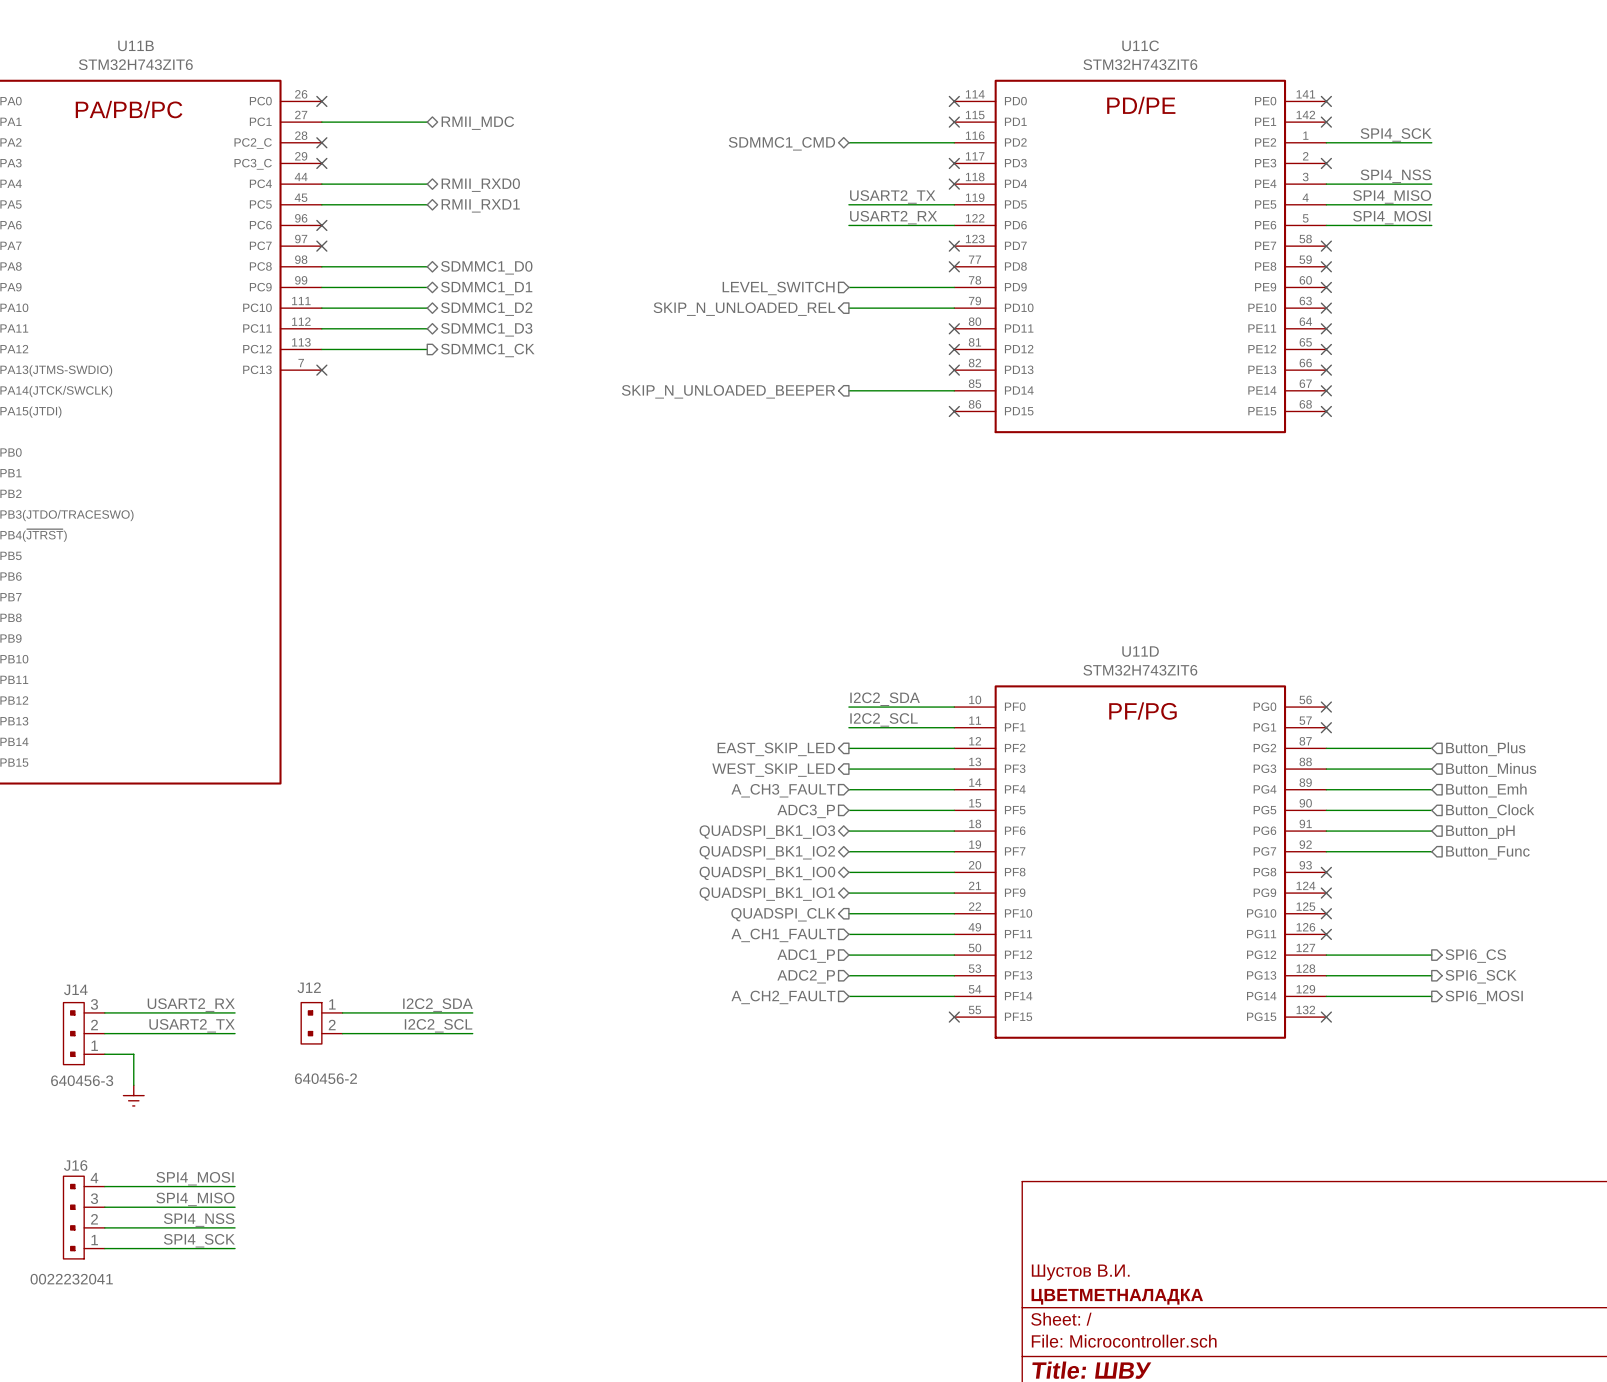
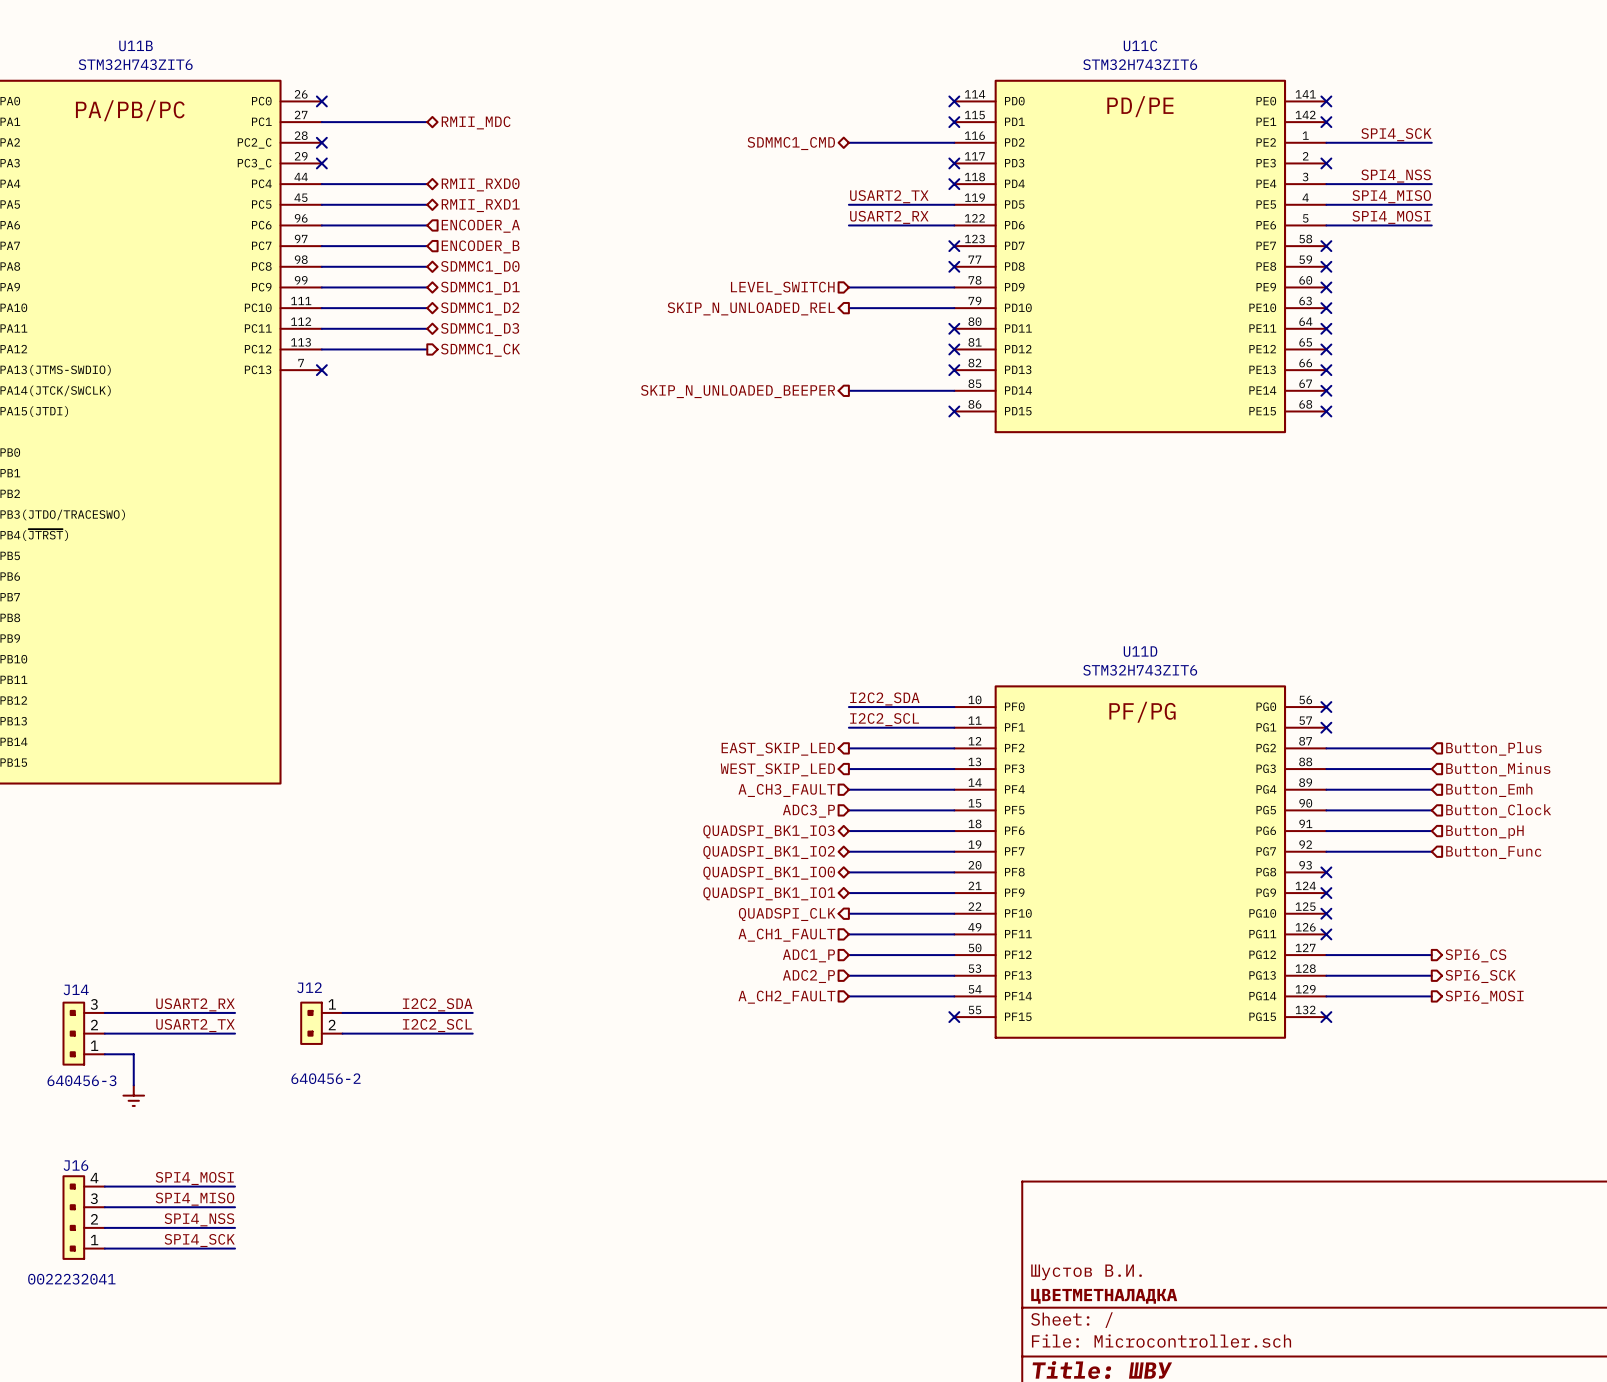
wire: none -> (321, 225) (427, 225)
no-connect mark: (321, 225) -> none
hierarchical label: none -> ENCODER_A (480, 226)
wire: none -> (321, 246) (427, 246)
no-connect mark: (321, 246) -> none
hierarchical label: none -> ENCODER_B (480, 246)

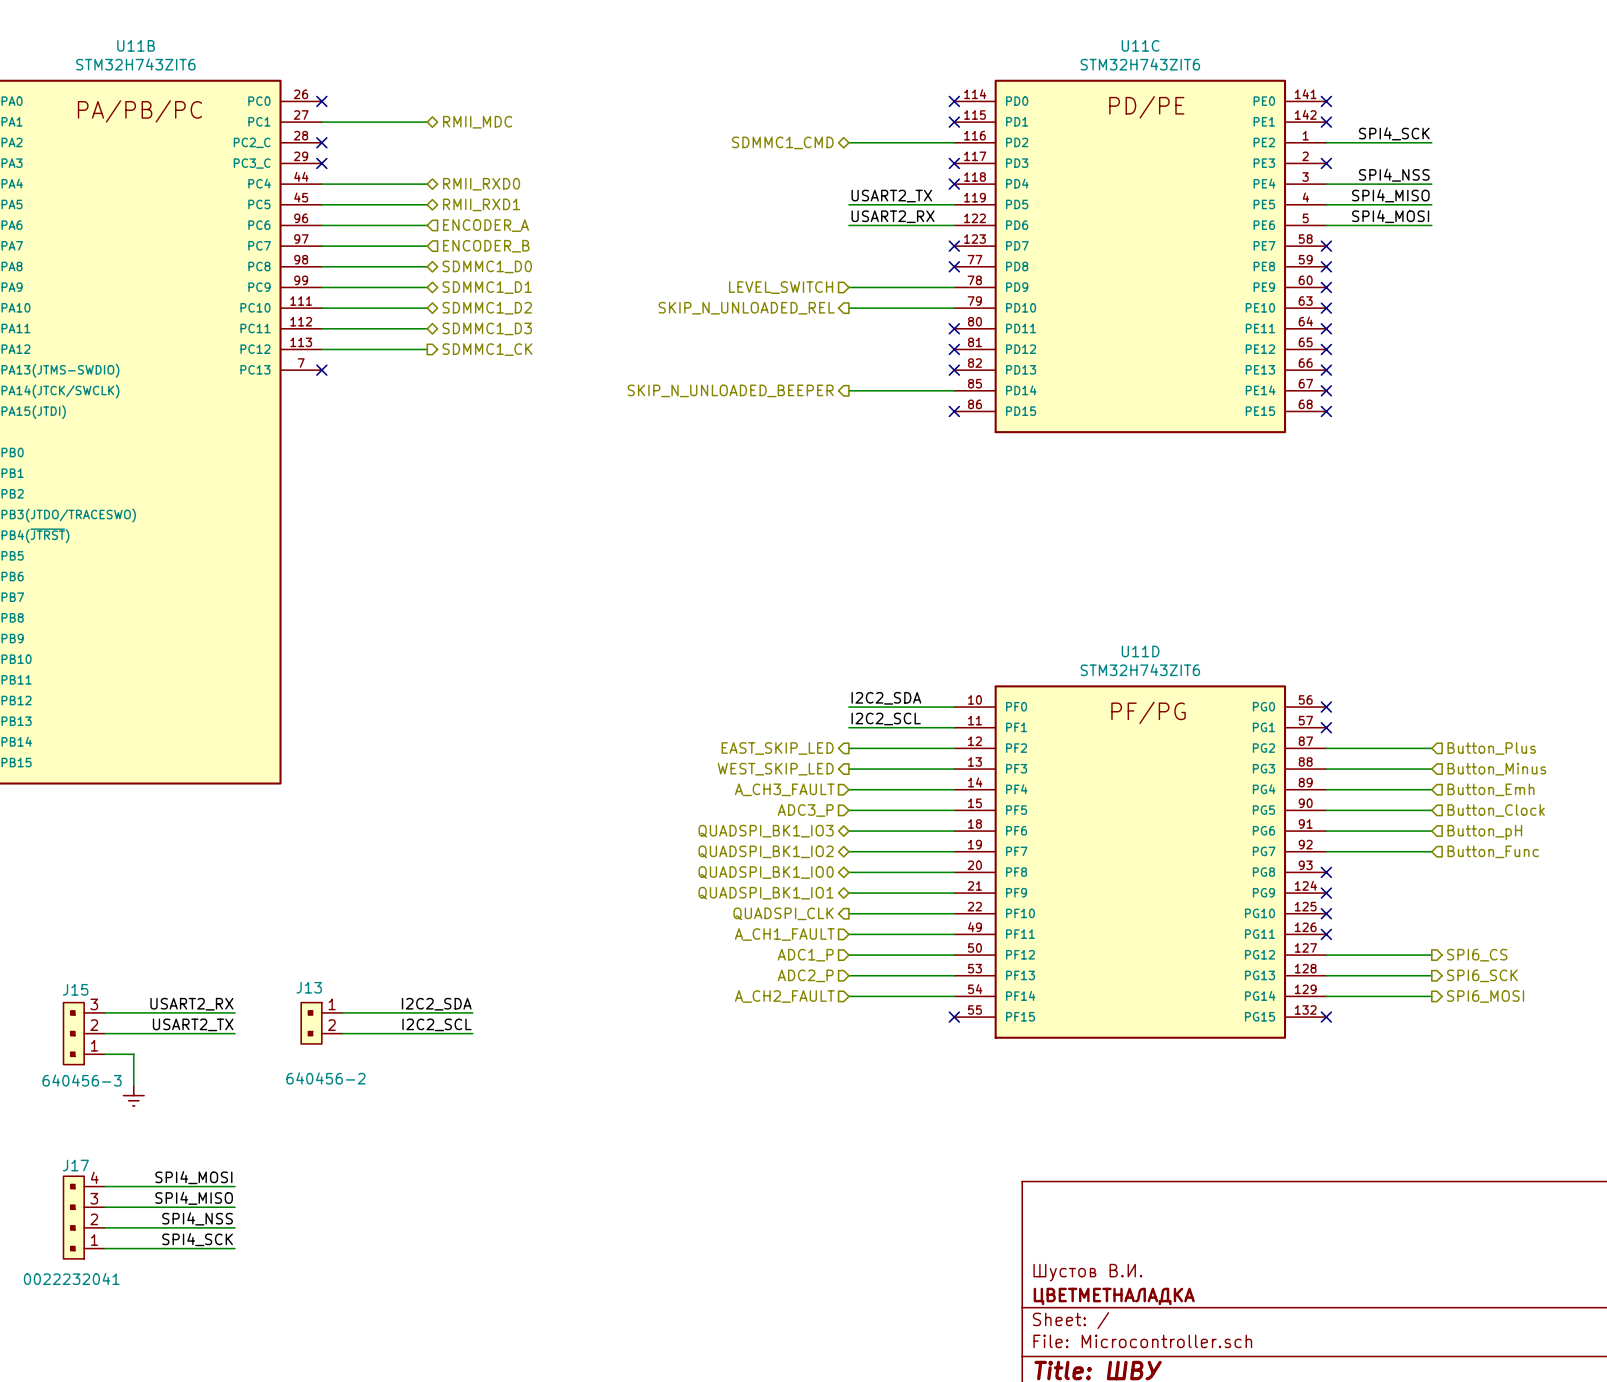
J12 name: J12 (309, 987) -> J13 (309, 987)
J14 name: J14 (76, 989) -> J15 (75, 989)
J16 name: J16 (75, 1165) -> J17 (75, 1165)

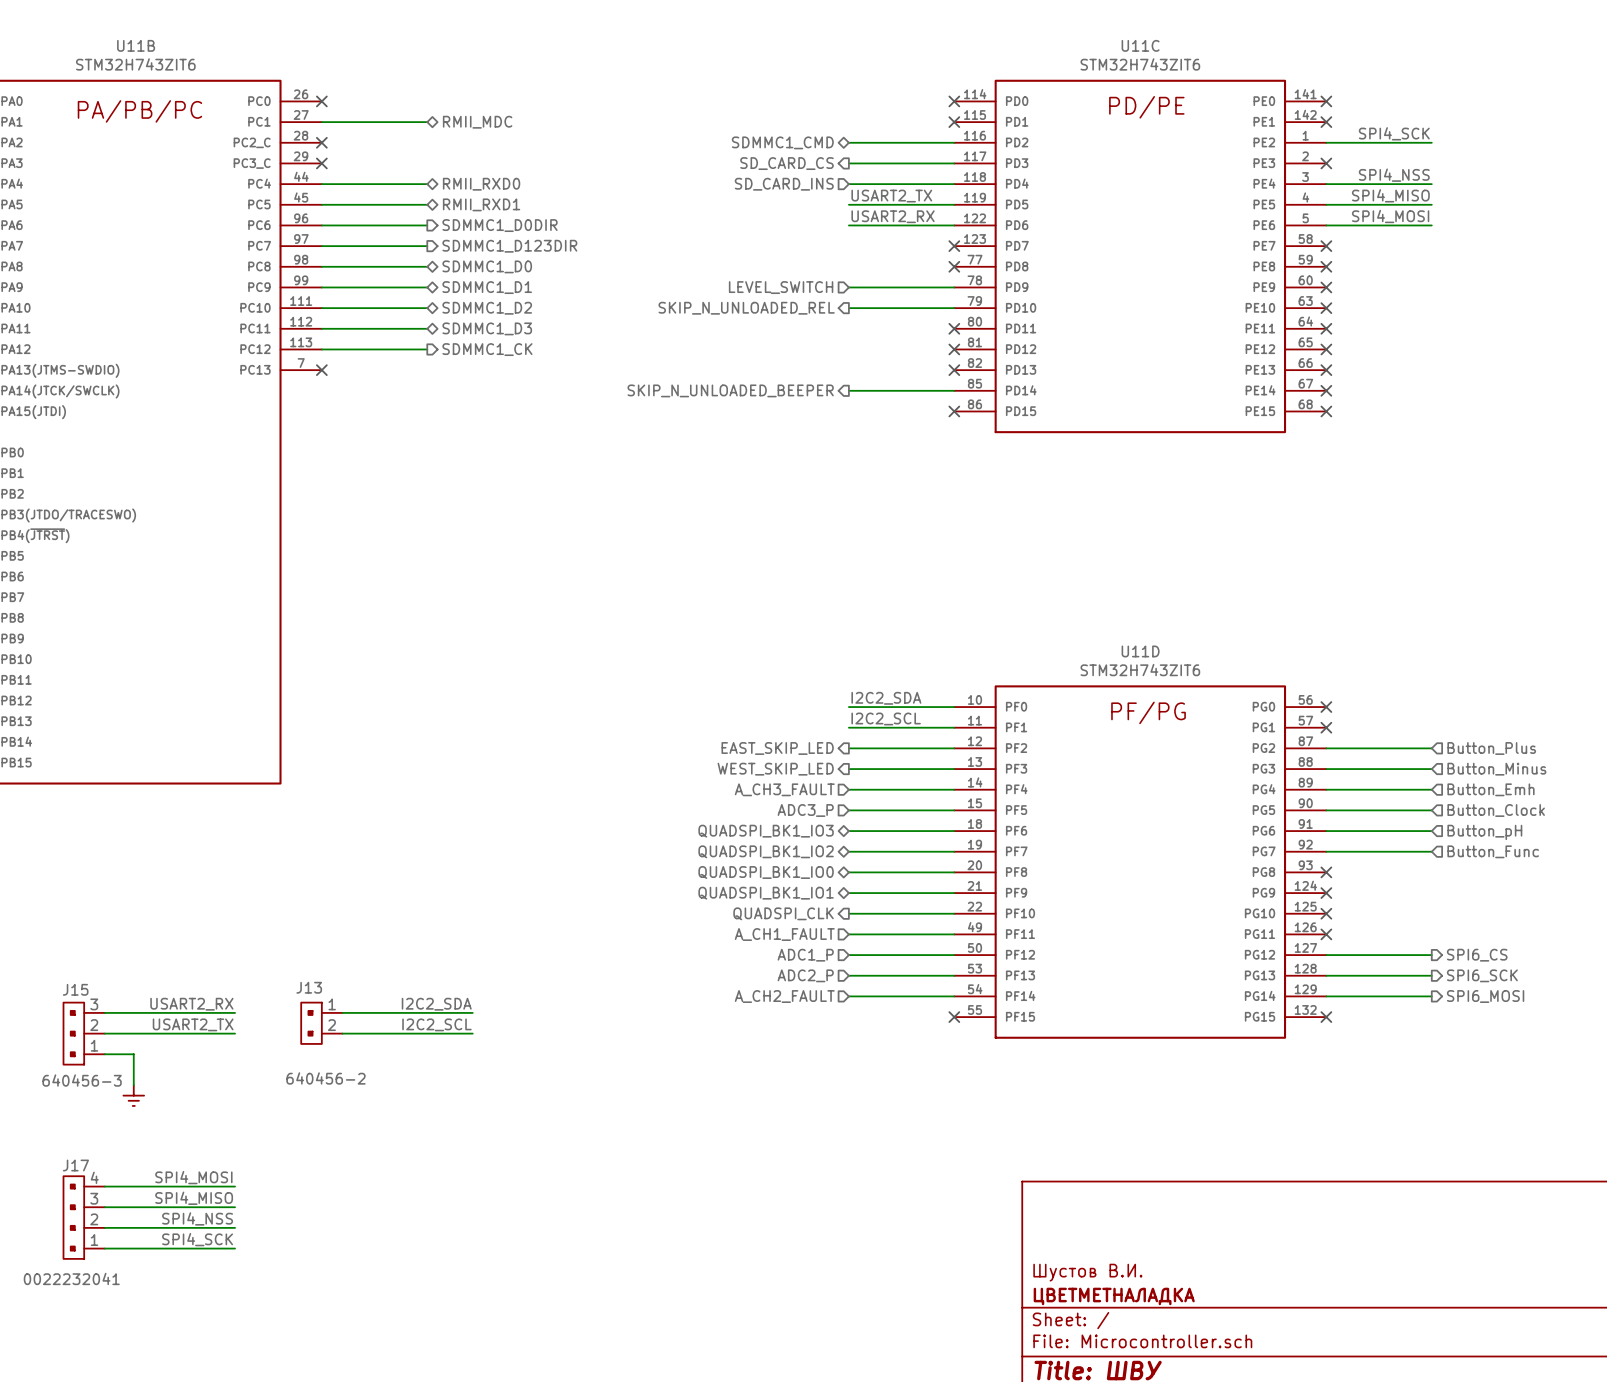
hierarchical label: none -> SD_CARD_CS (786, 163)
wire: none -> (848, 163) (954, 163)
no-connect mark: (954, 163) -> none
hierarchical label: none -> SD_CARD_INS (784, 184)
wire: none -> (848, 184) (954, 184)
no-connect mark: (954, 184) -> none
hierarchical label shape: input (485, 225) -> output (500, 225)
hierarchical label: ENCODER_A (485, 225) -> SDMMC1_D0DIR (500, 225)
hierarchical label shape: input (486, 246) -> output (509, 246)
hierarchical label: ENCODER_B (486, 246) -> SDMMC1_D123DIR (509, 246)

